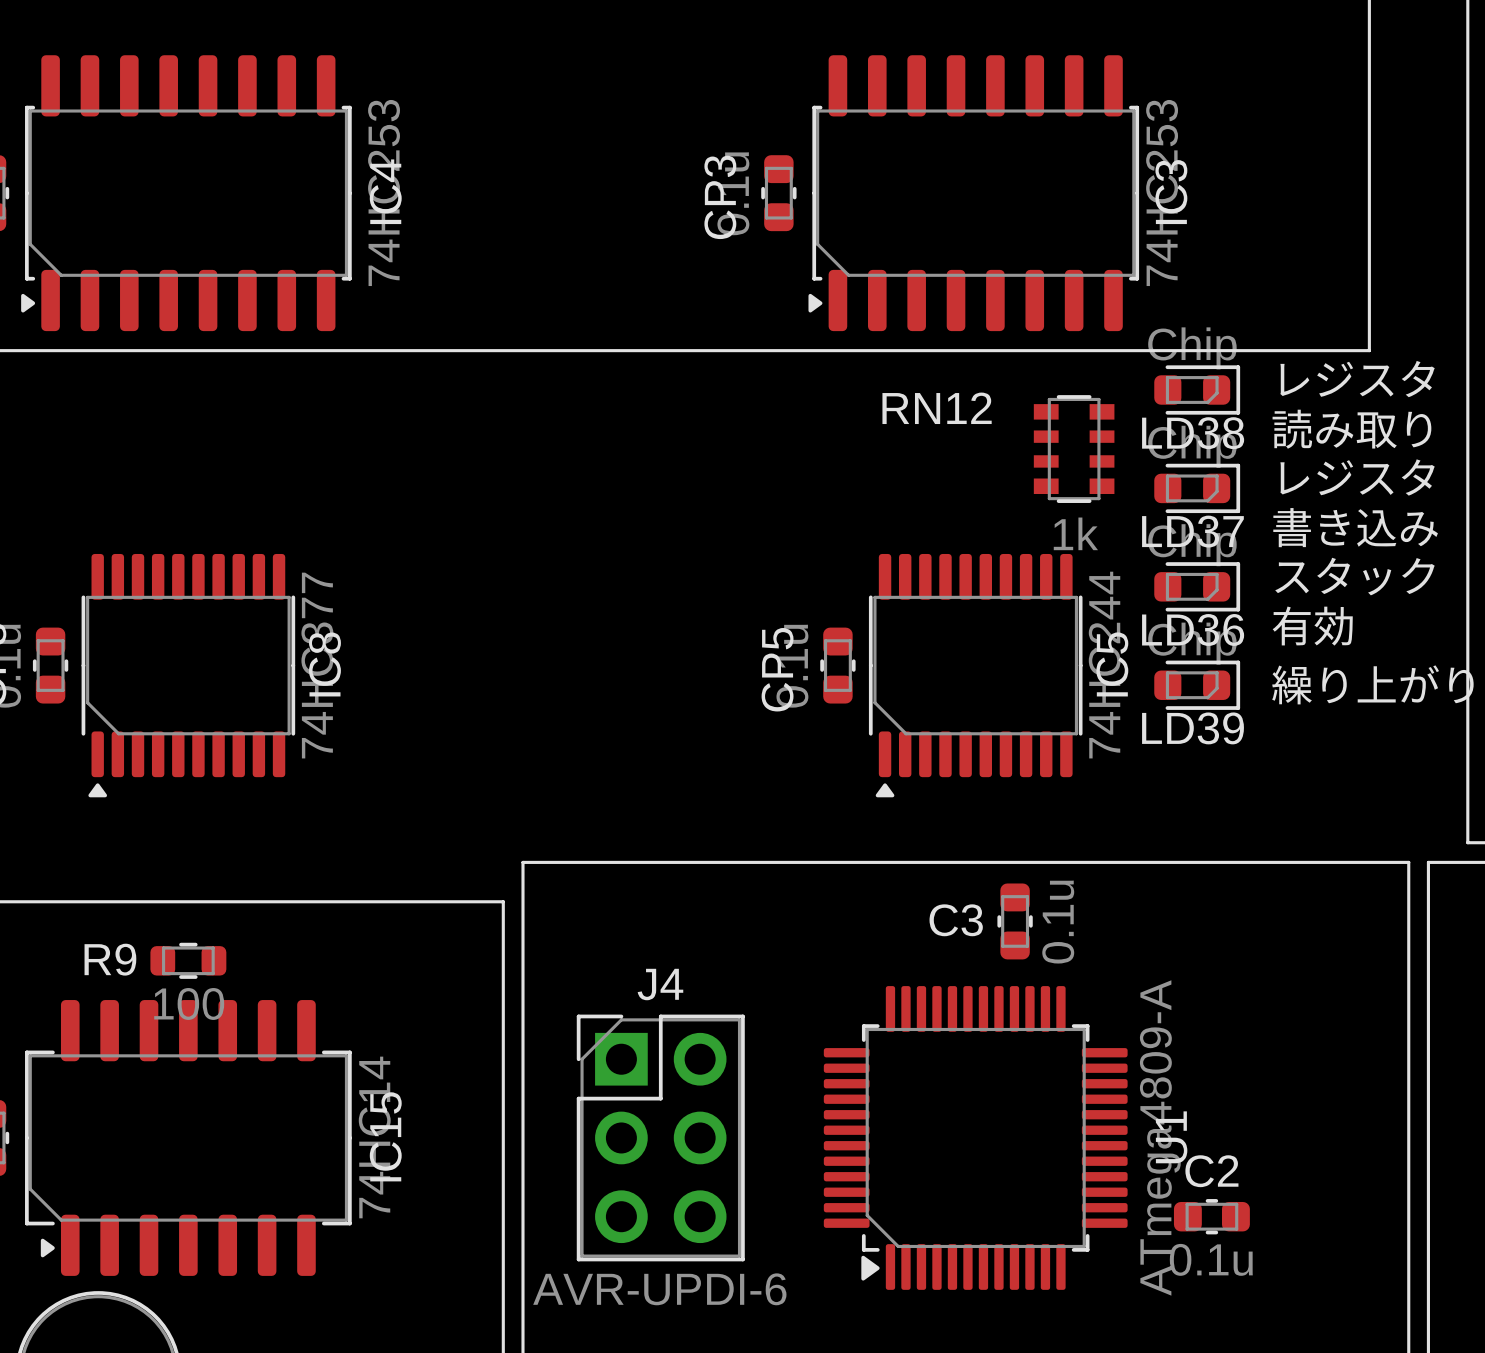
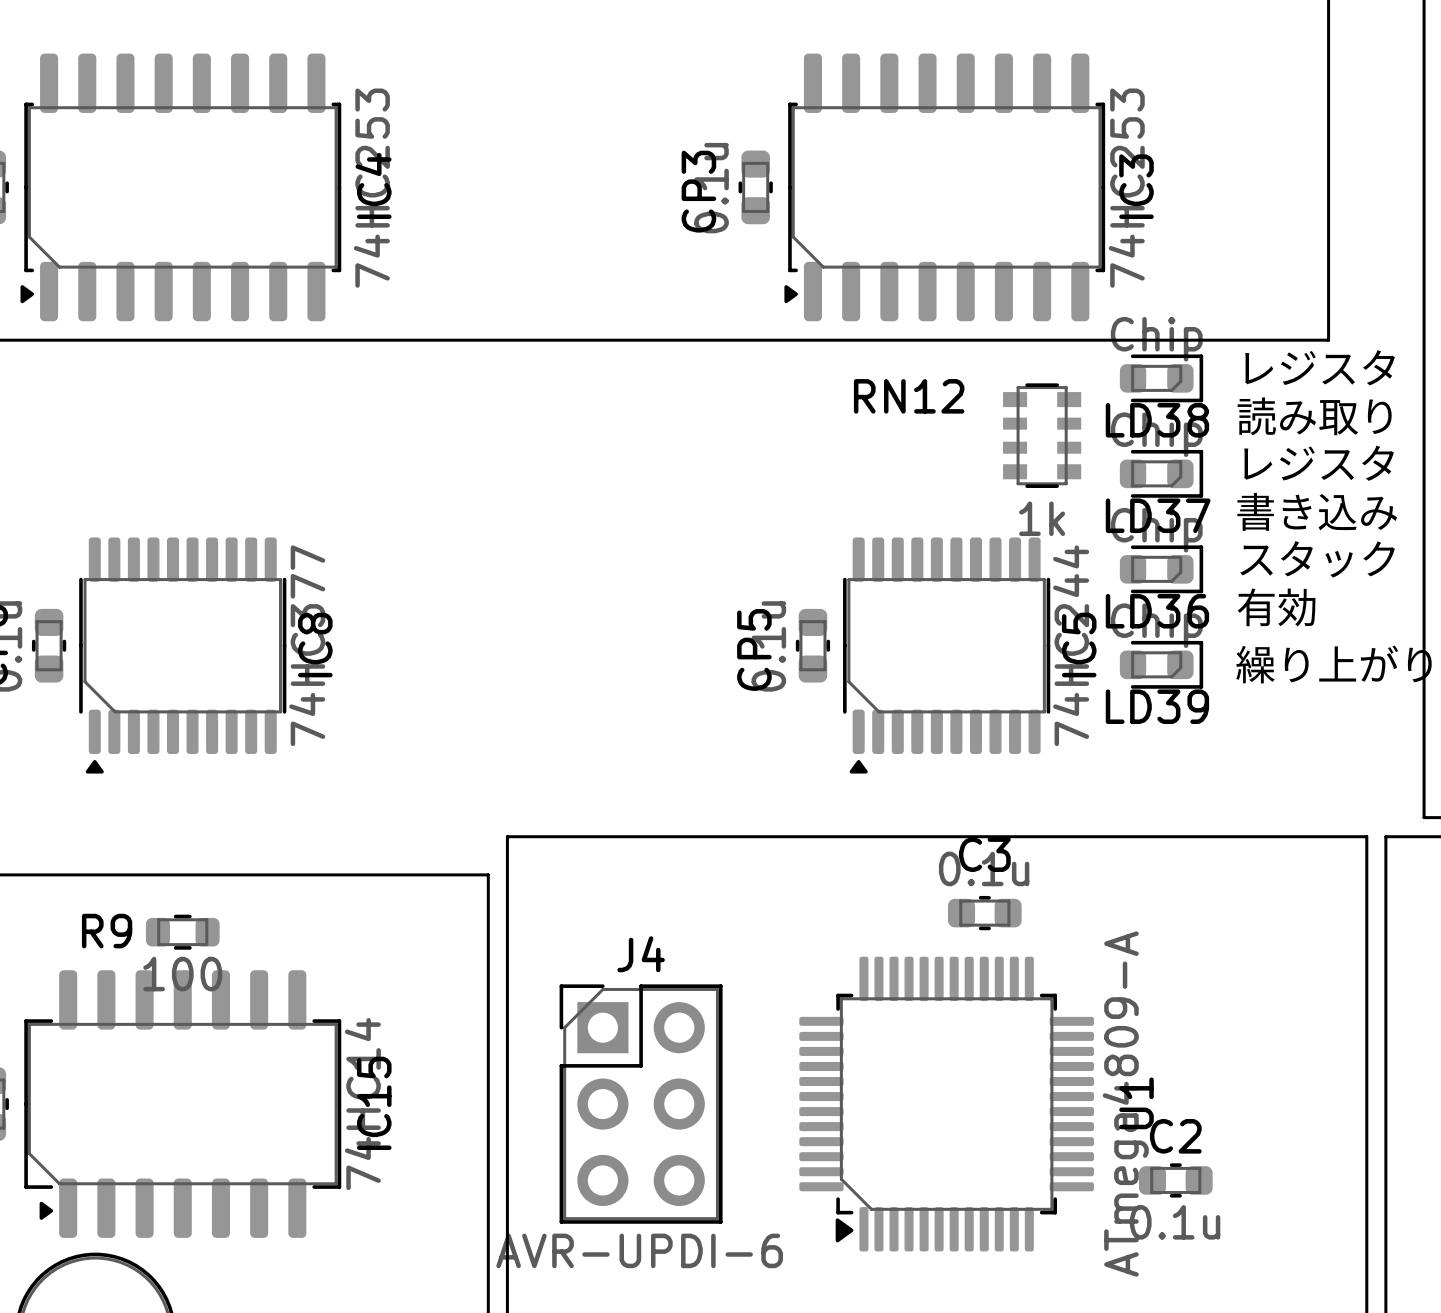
C3 rotation: 0° (1015, 921) -> 90° clockwise (984, 913)
C3 value position: 0.1u (1058, 922) -> 0.1u (984, 868)

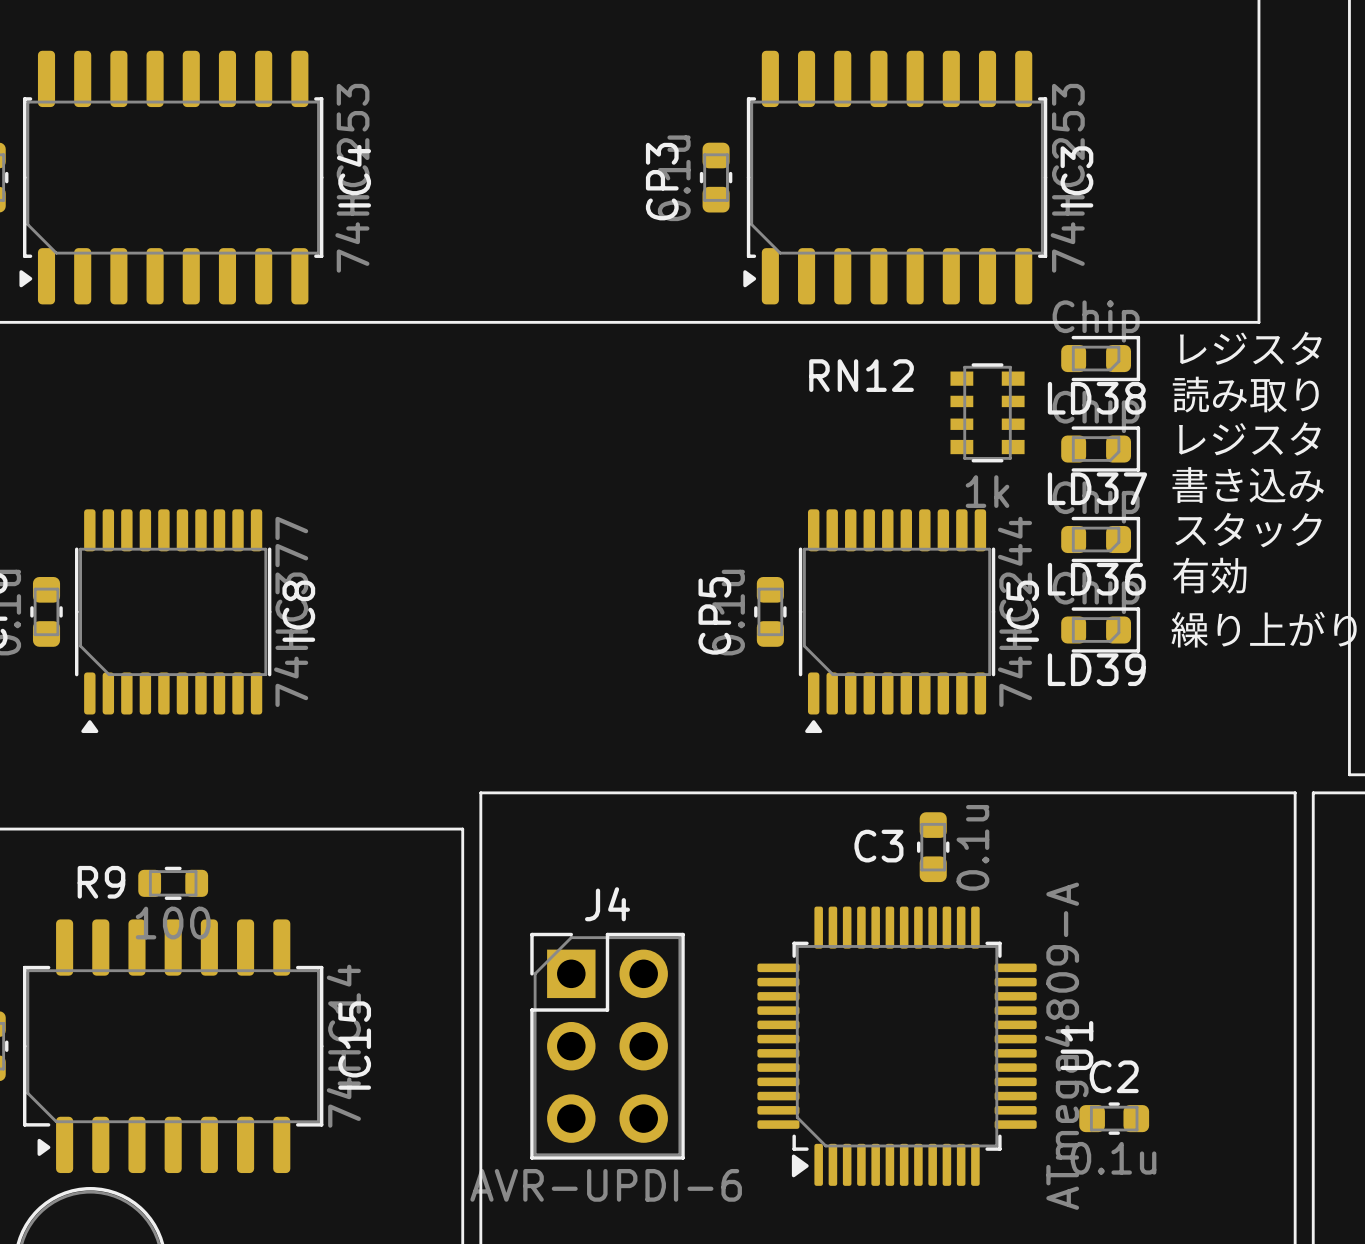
C3 name position: C3 (984, 854) -> C3 (878, 846)
C3 rotation: 0° (984, 913) -> 90° clockwise (933, 847)

